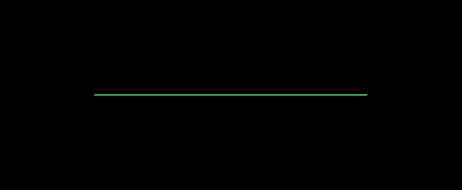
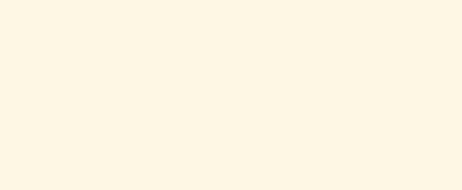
wire: (94, 94) (366, 94) -> none

